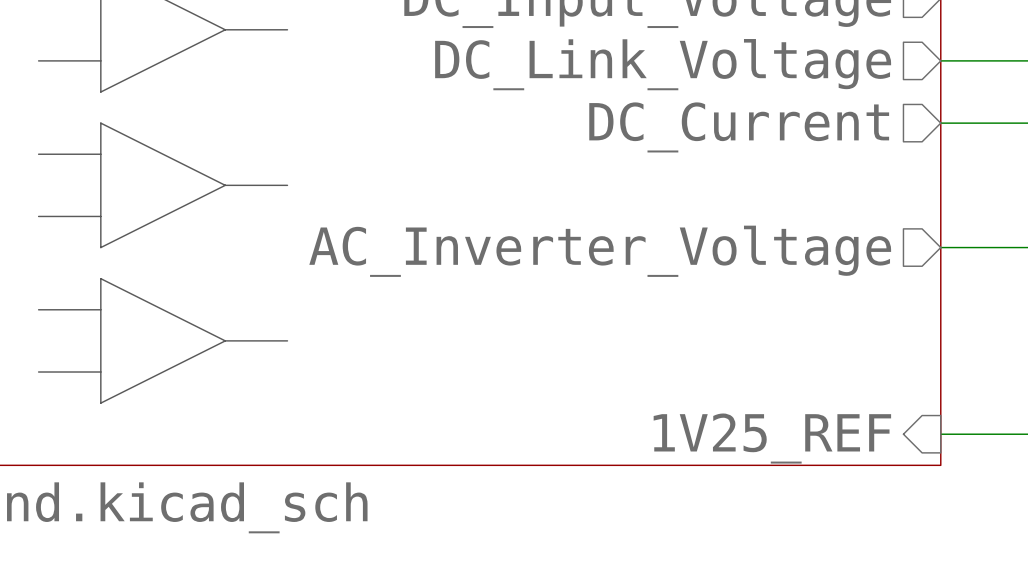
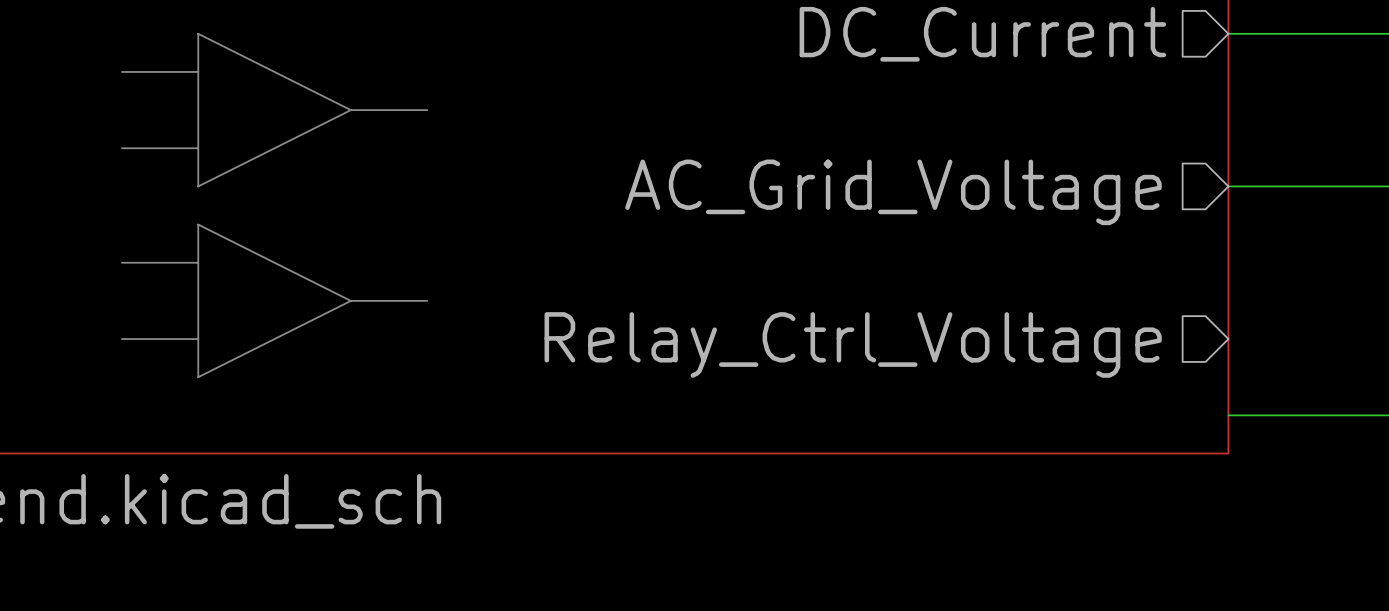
sheet pin: AC_Inverter_Voltage (600, 251) -> AC_Grid_Voltage (893, 192)
sheet pin: none -> Relay_Ctrl_Voltage (853, 344)
sheet pin: 1V25_REF (772, 438) -> none

